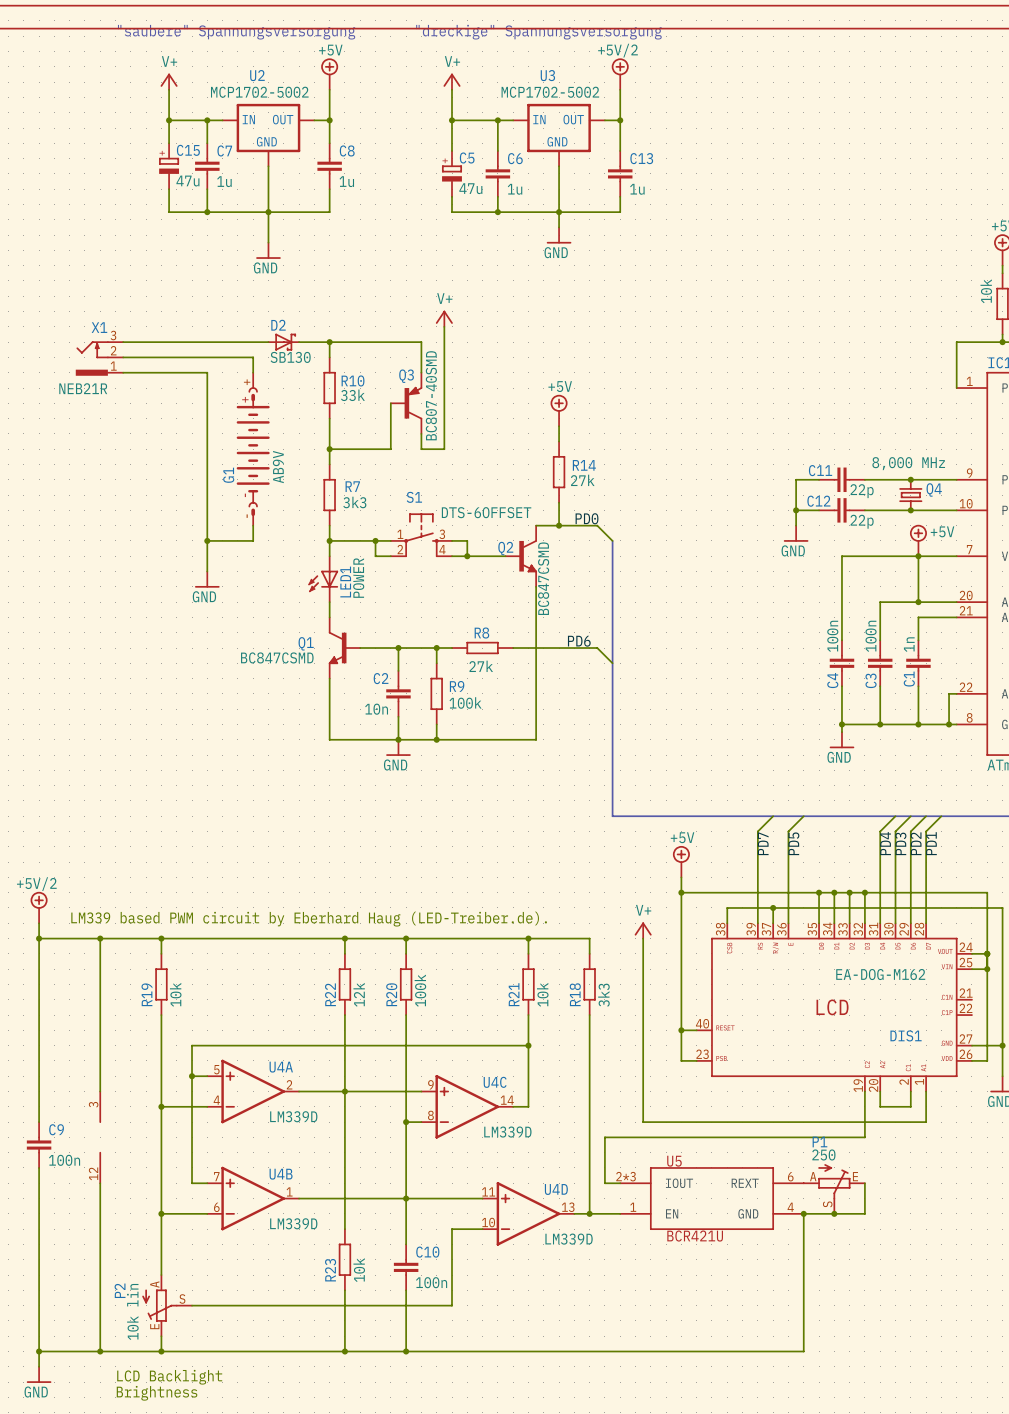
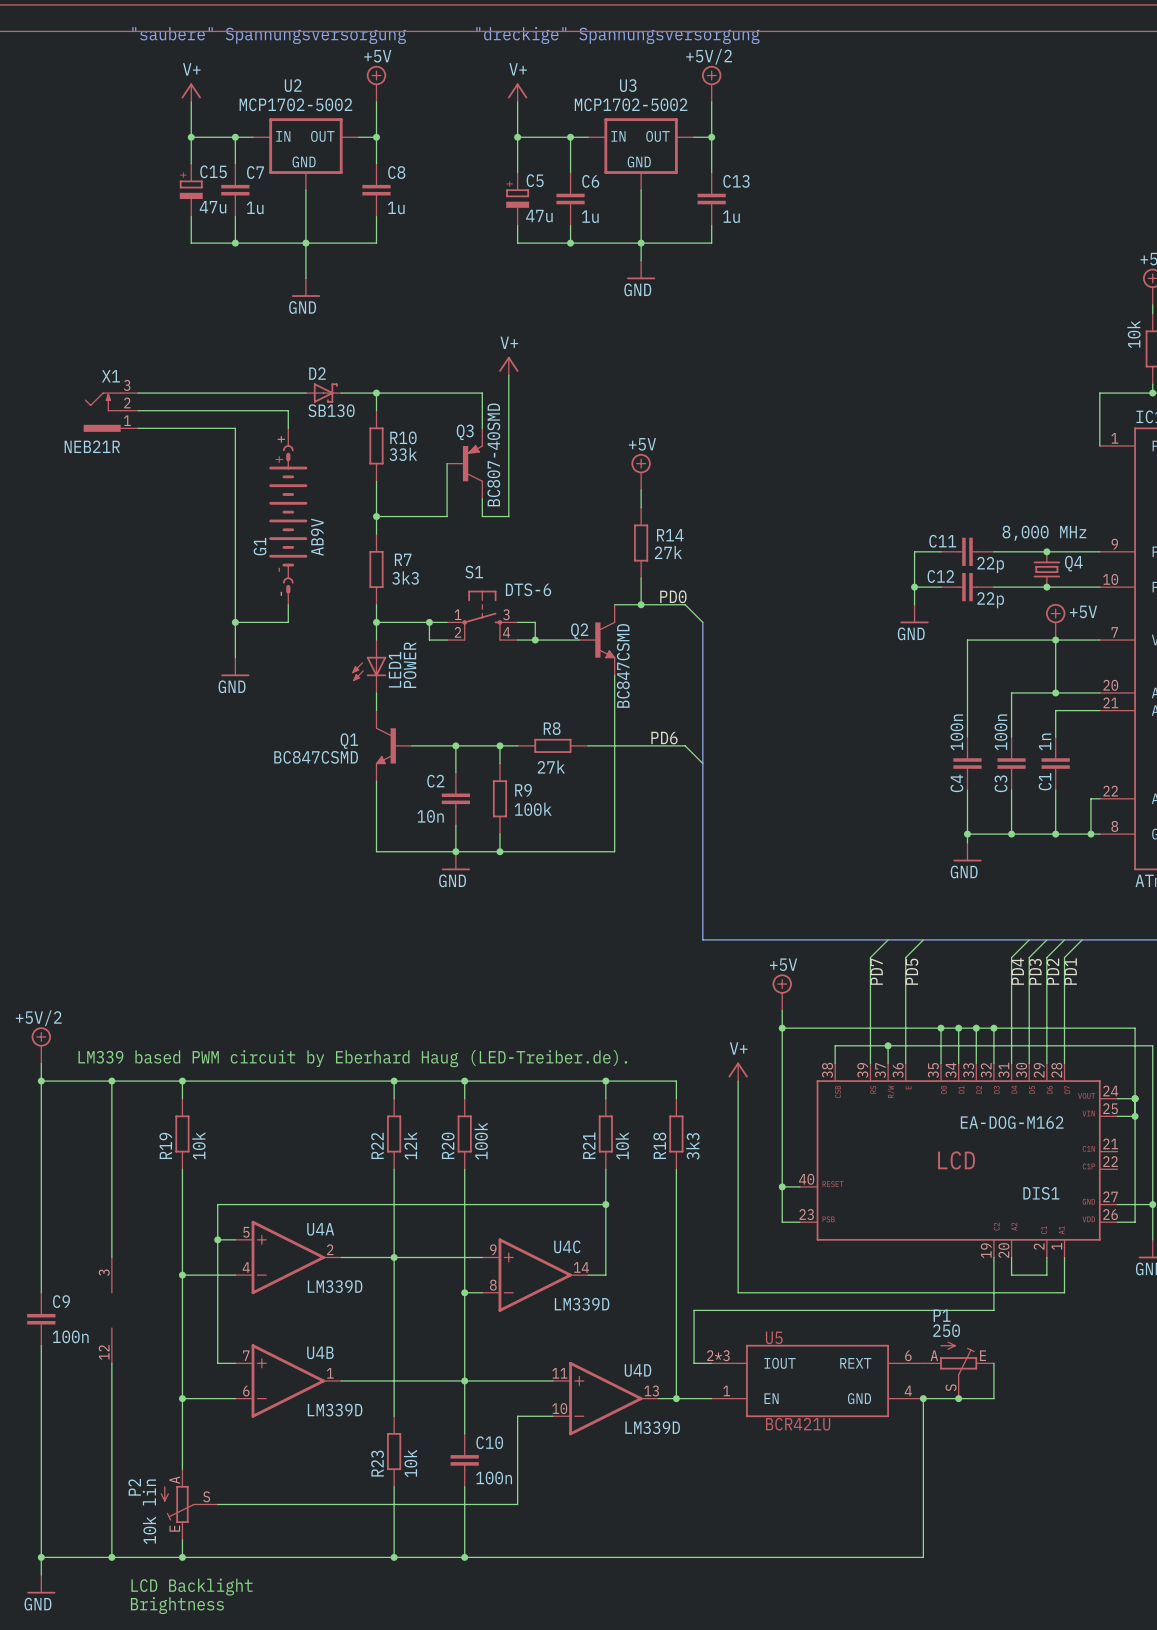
S1 value: DTS-6OFFSET (486, 512) -> DTS-6 (528, 589)

